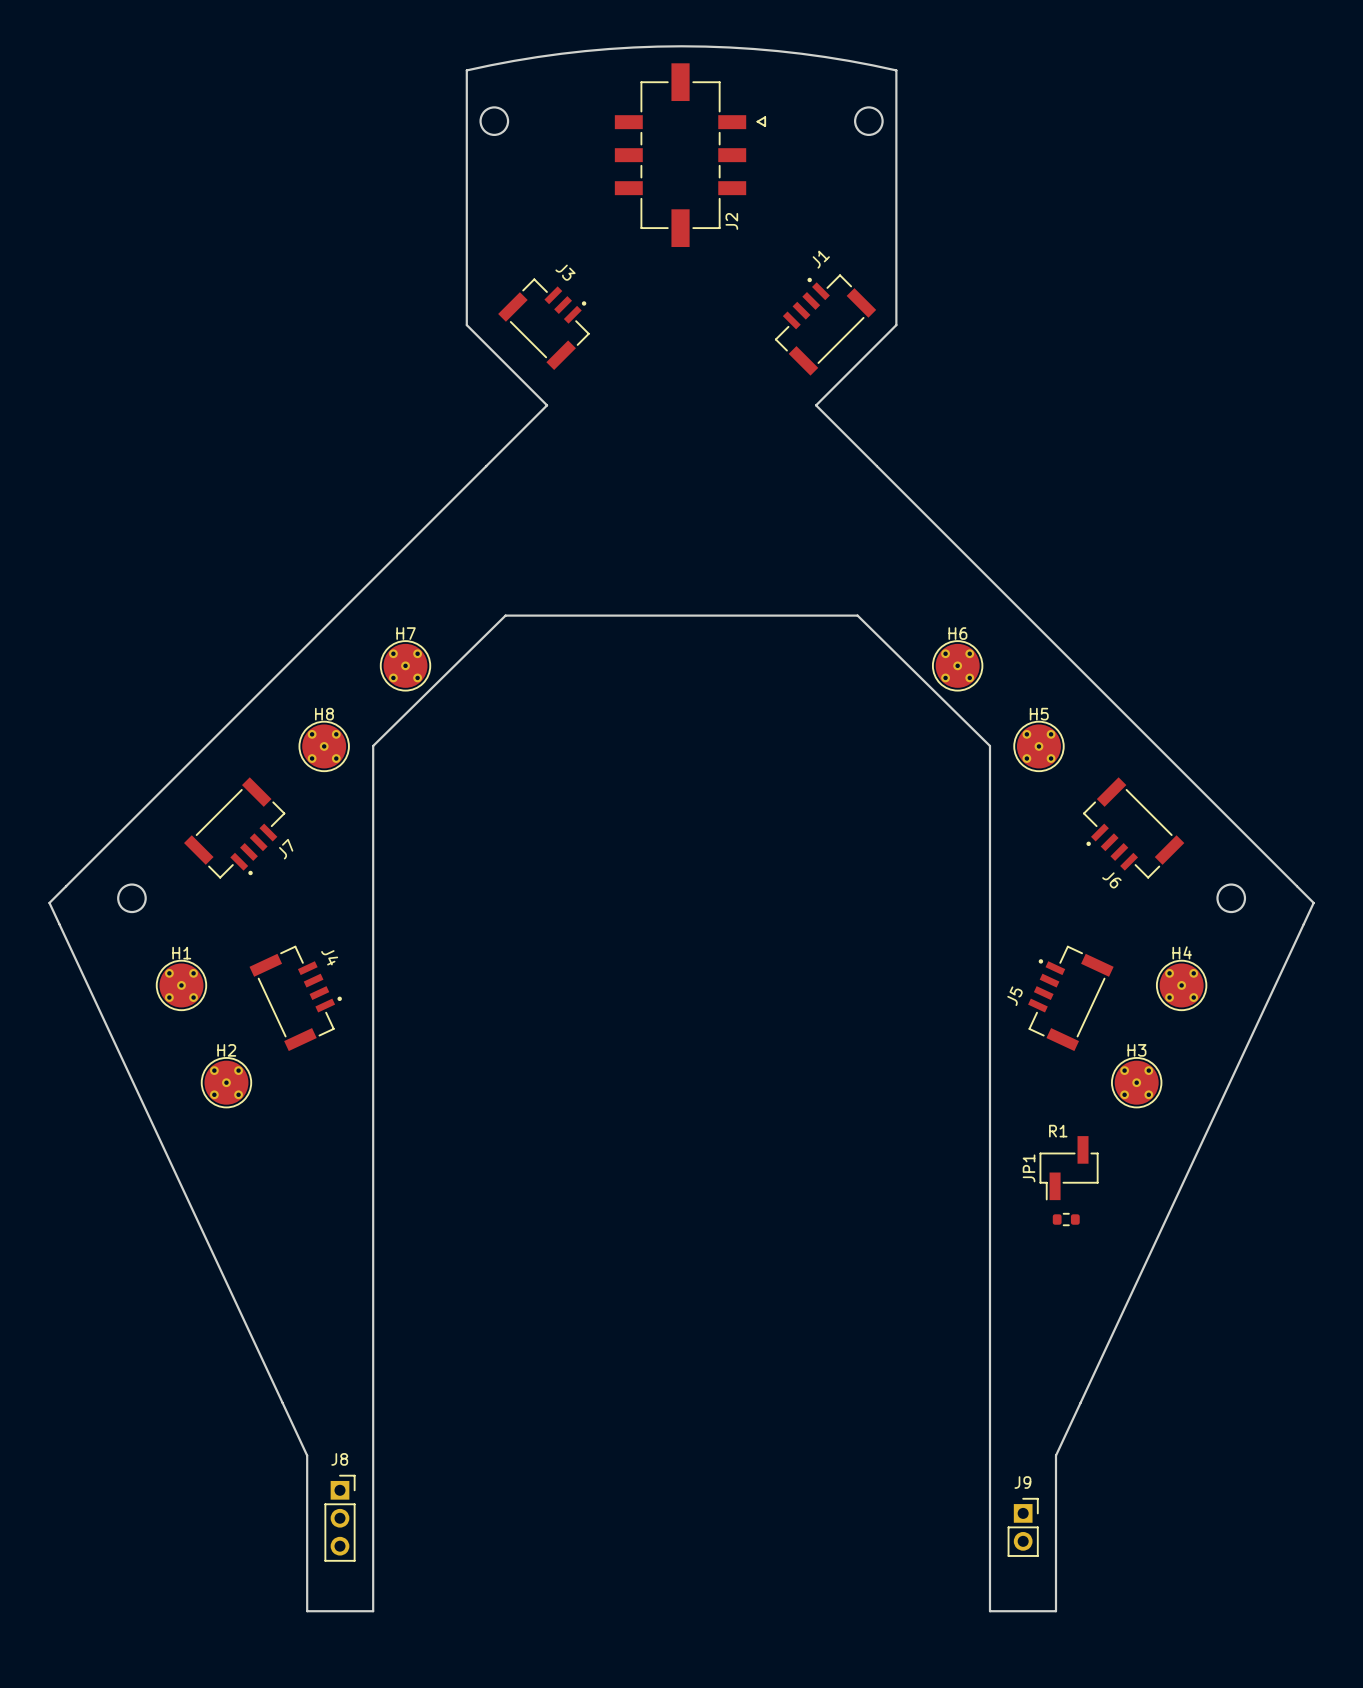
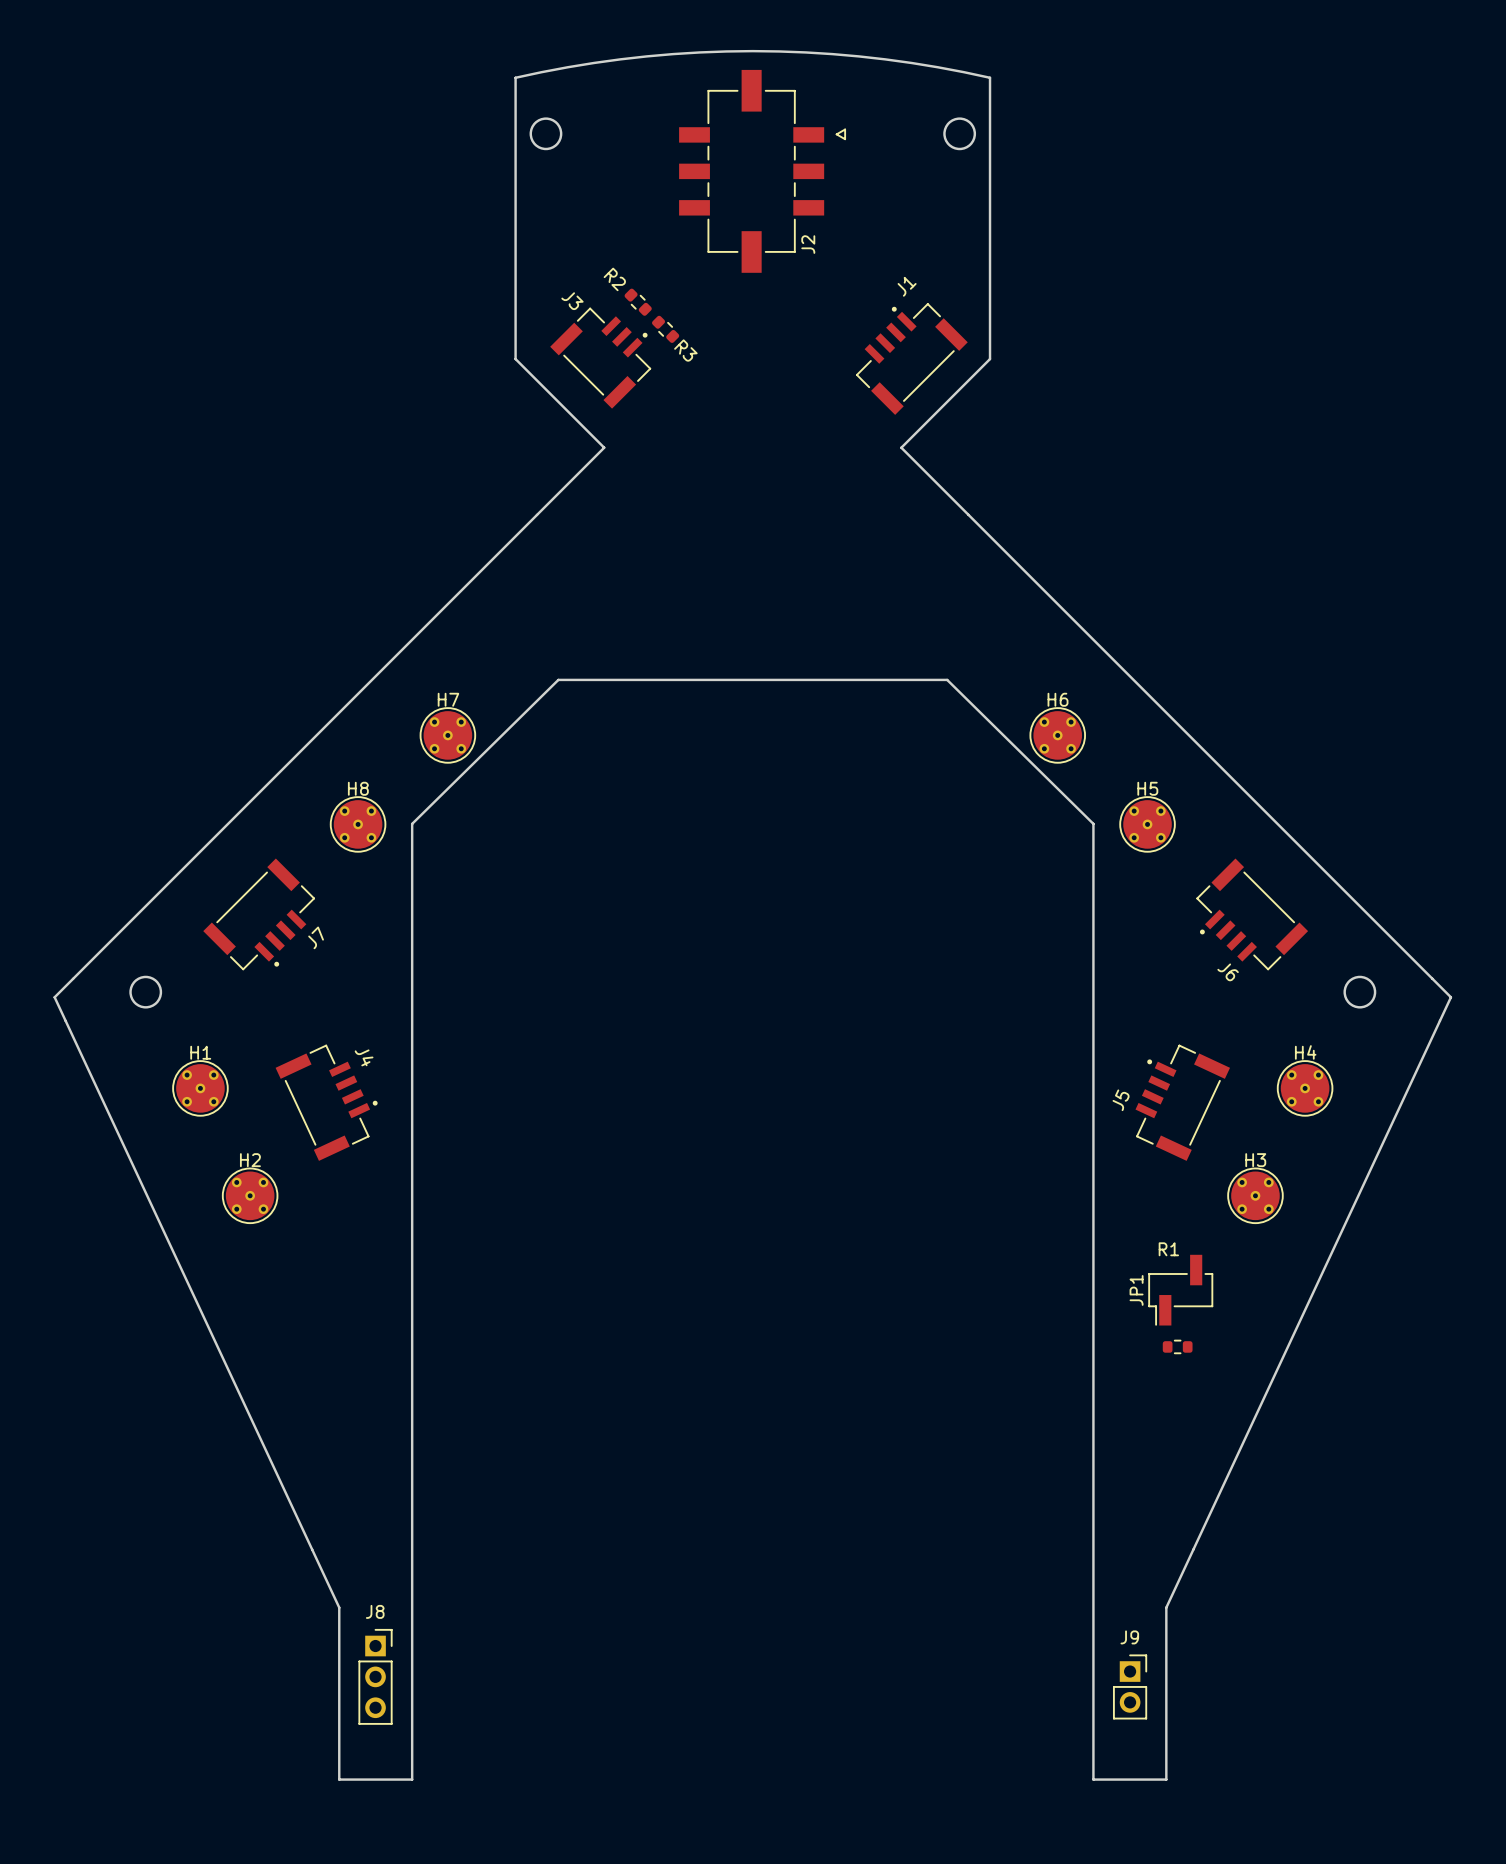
J3 name position: J3 (565, 272) -> J3 (572, 301)
R2: none -> (638, 302)
R3: none -> (665, 329)

